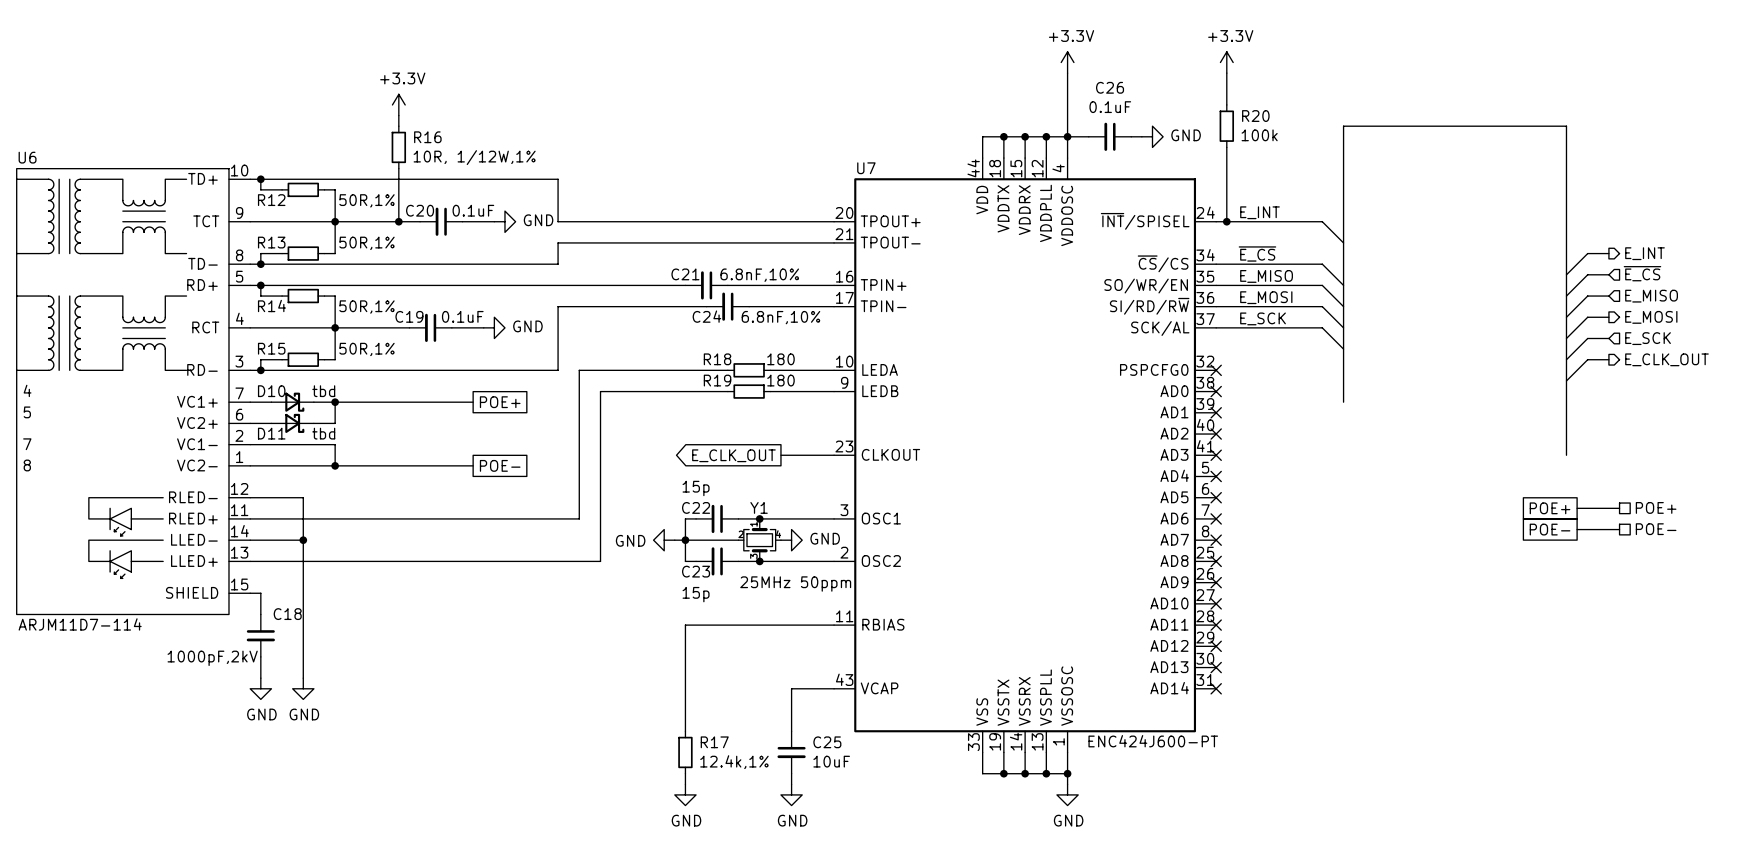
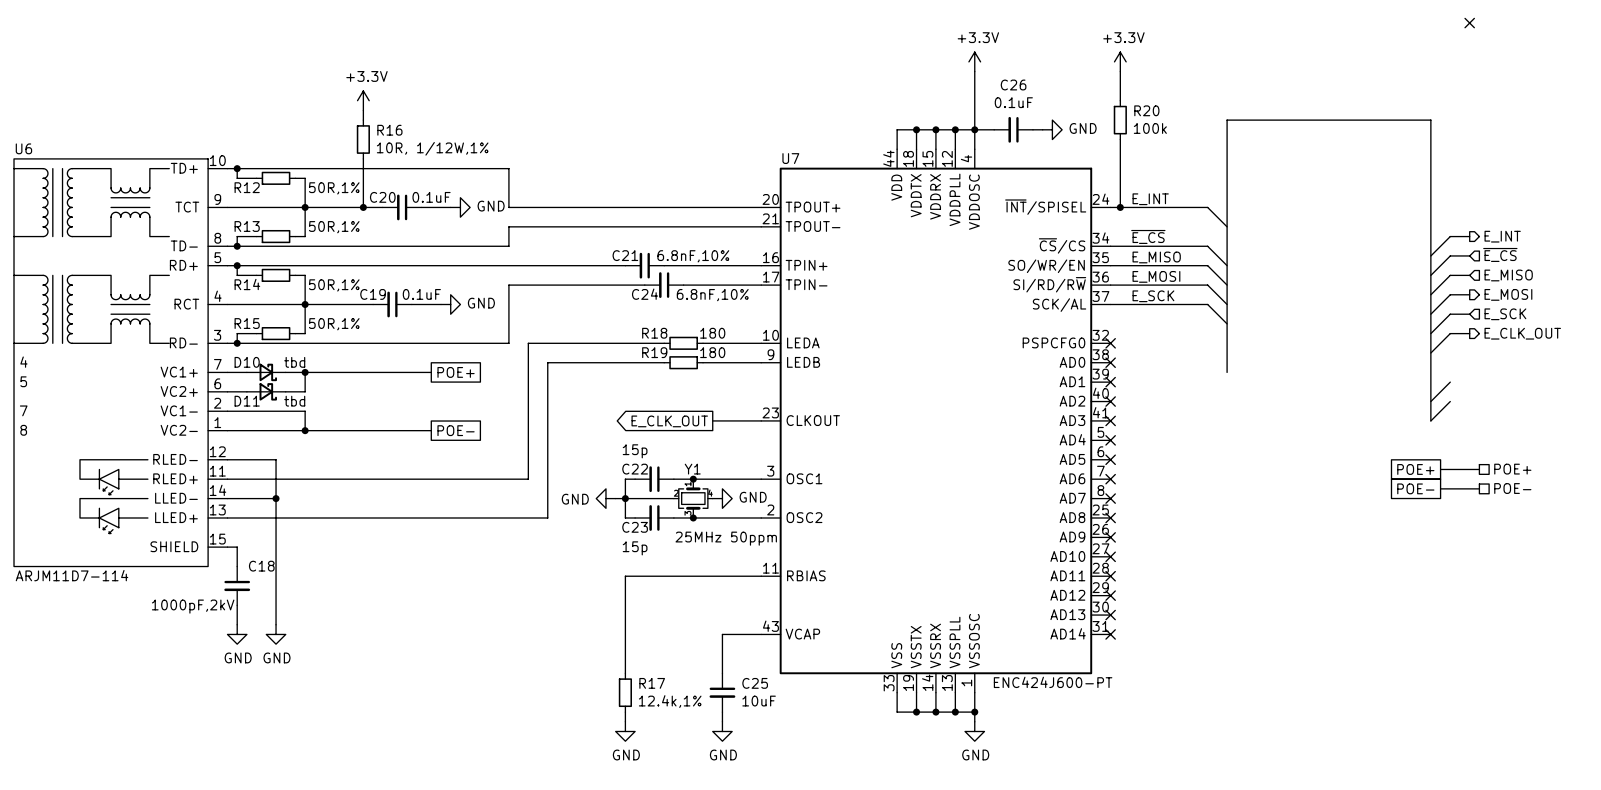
no-connect mark: none -> (1469, 23)
wire: none -> (1450, 382) (1430, 401)
wire: none -> (1450, 401) (1430, 420)

